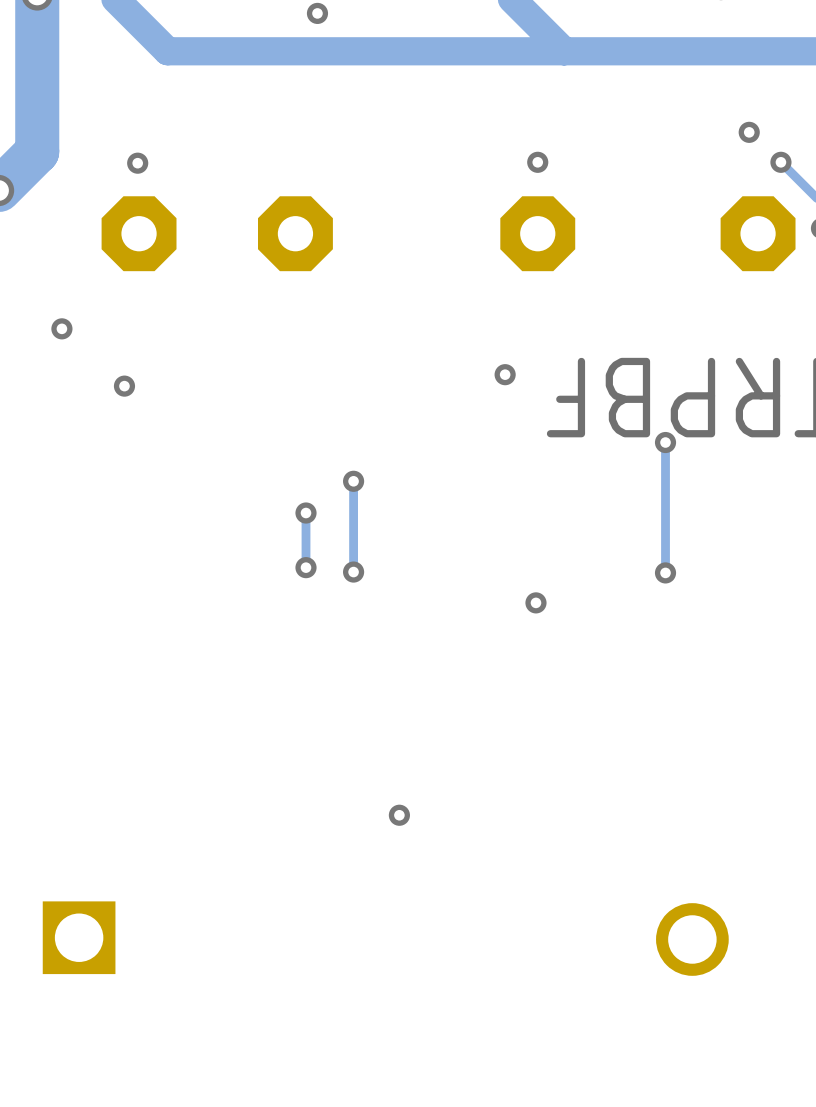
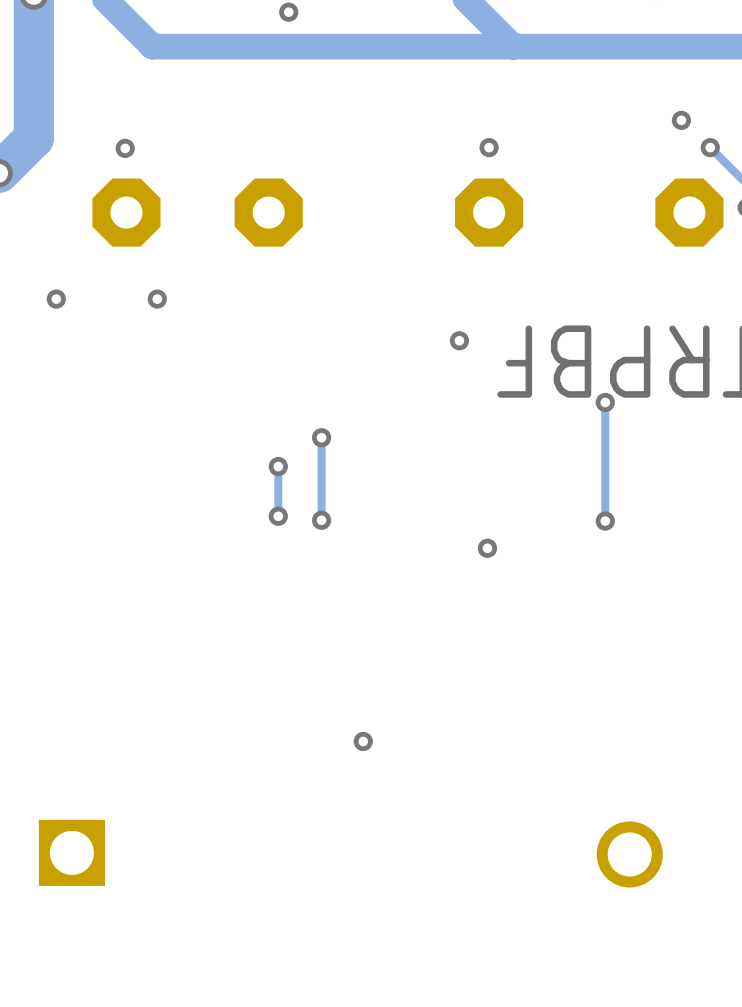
via position: (124, 386) -> (157, 299)

